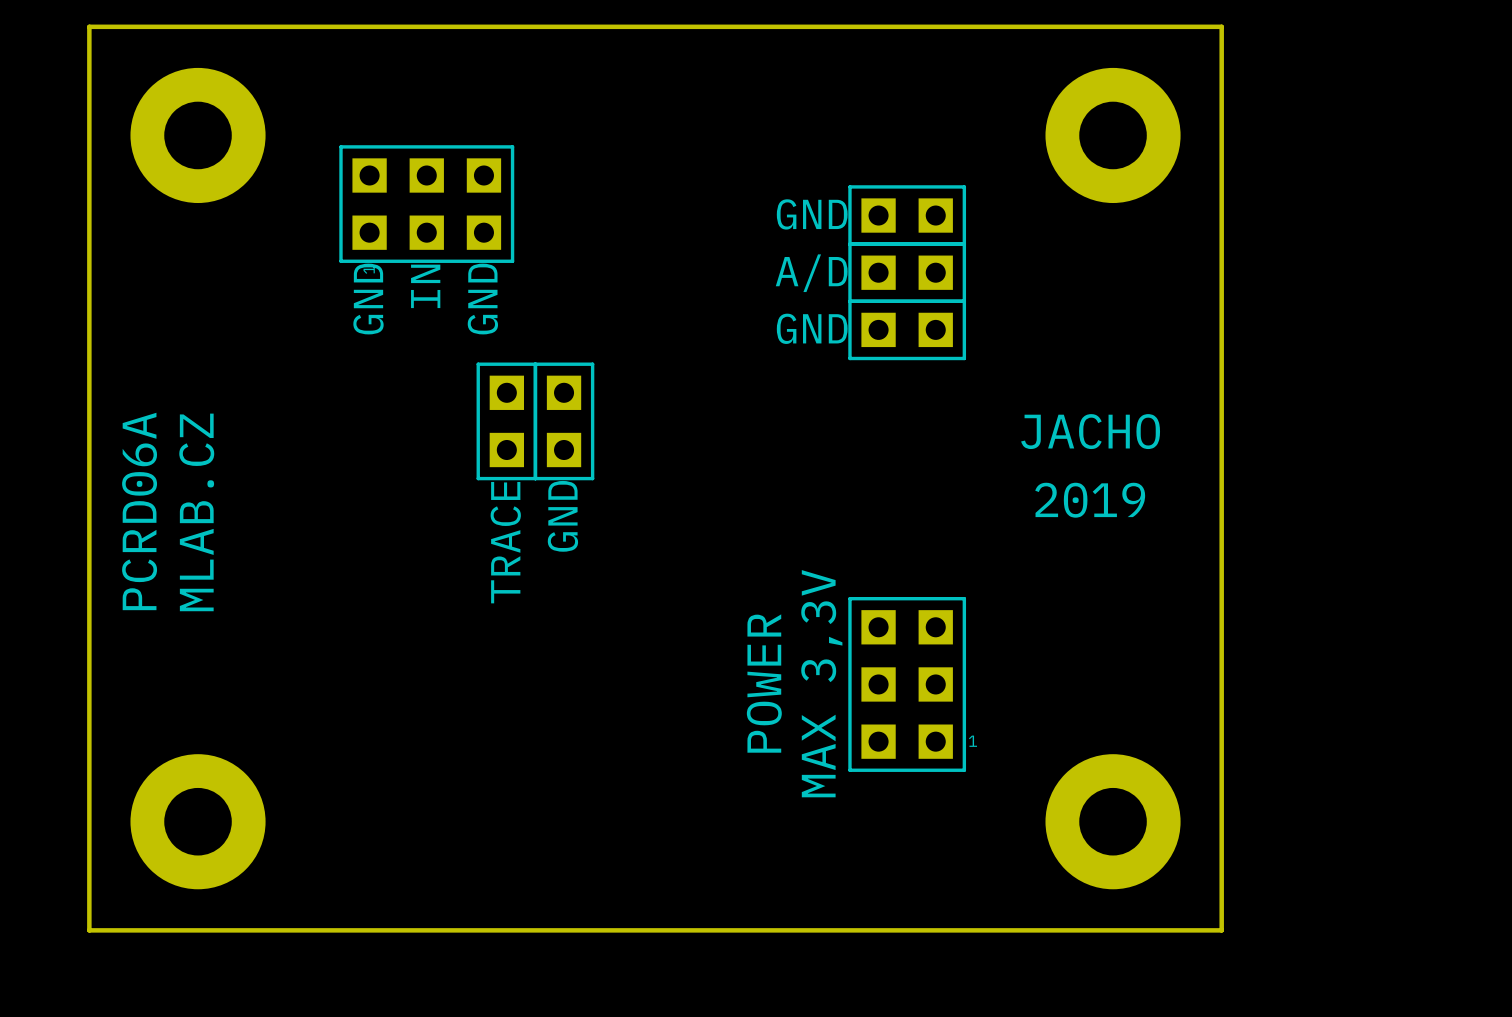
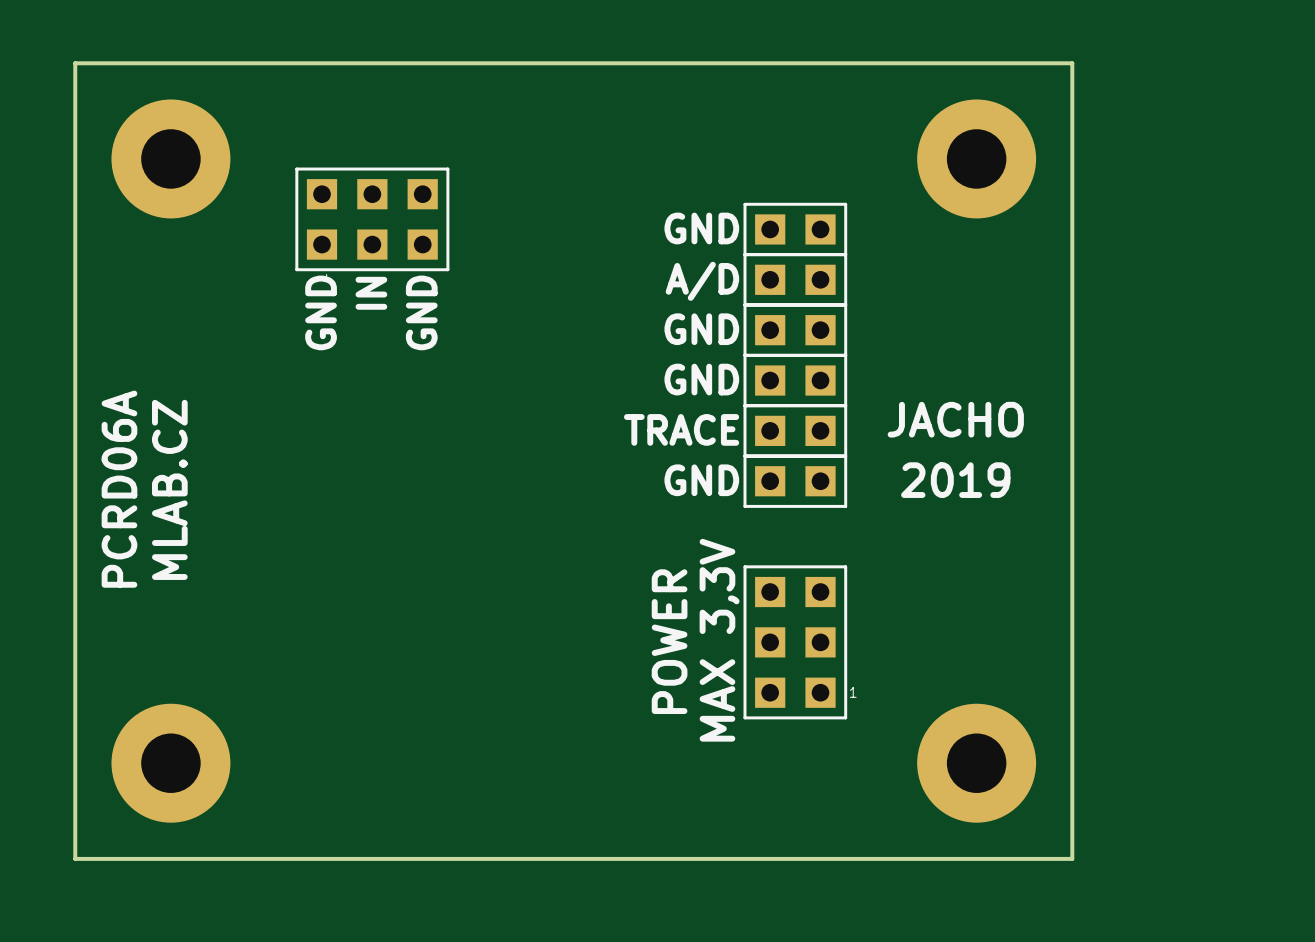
text: none -> GND (701, 379)
part: none -> (795, 380)
part: (506, 421) -> none
part: (564, 421) -> none
part: none -> (795, 430)
text: none -> GND (701, 480)
part: none -> (795, 481)
text: GND (562, 516) -> none
text rotation: 0° (505, 542) -> 90° clockwise (681, 429)
text position: TRACE (505, 542) -> TRACE (681, 429)

